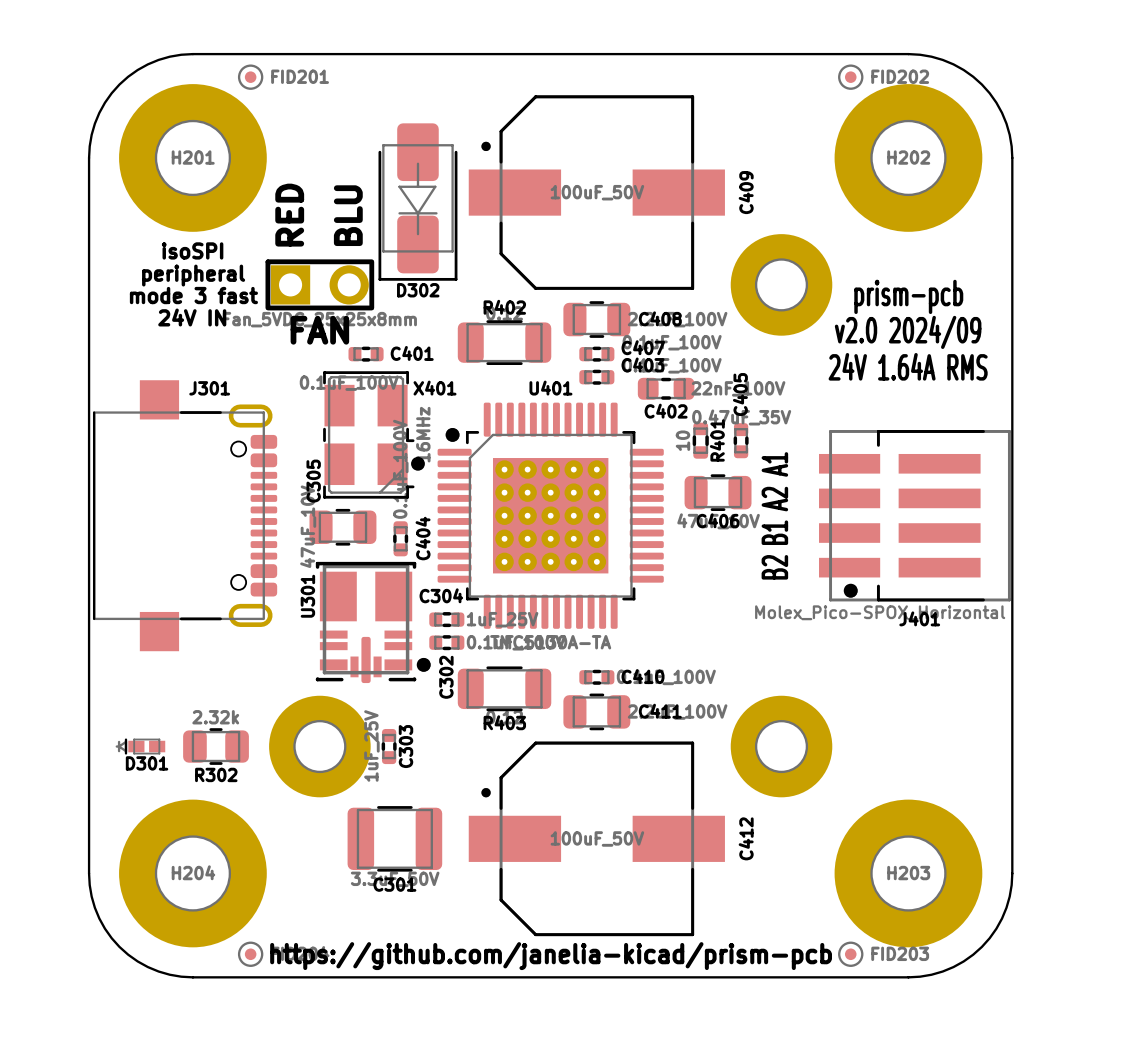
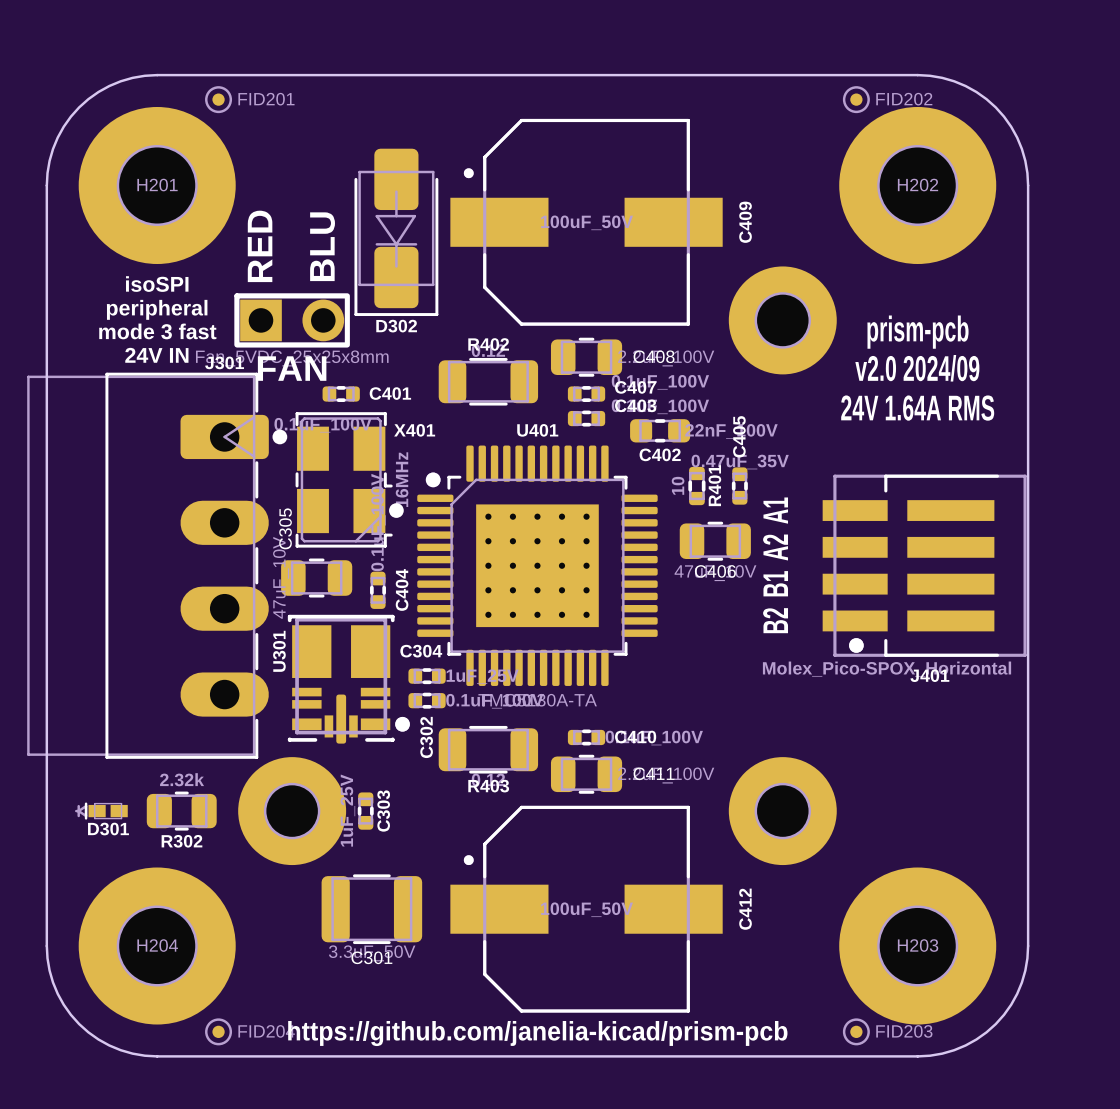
J301 footprint: [92, 380, 278, 652] -> [27, 372, 288, 759]
J301 name position: J301 (209, 388) -> J301 (224, 362)

